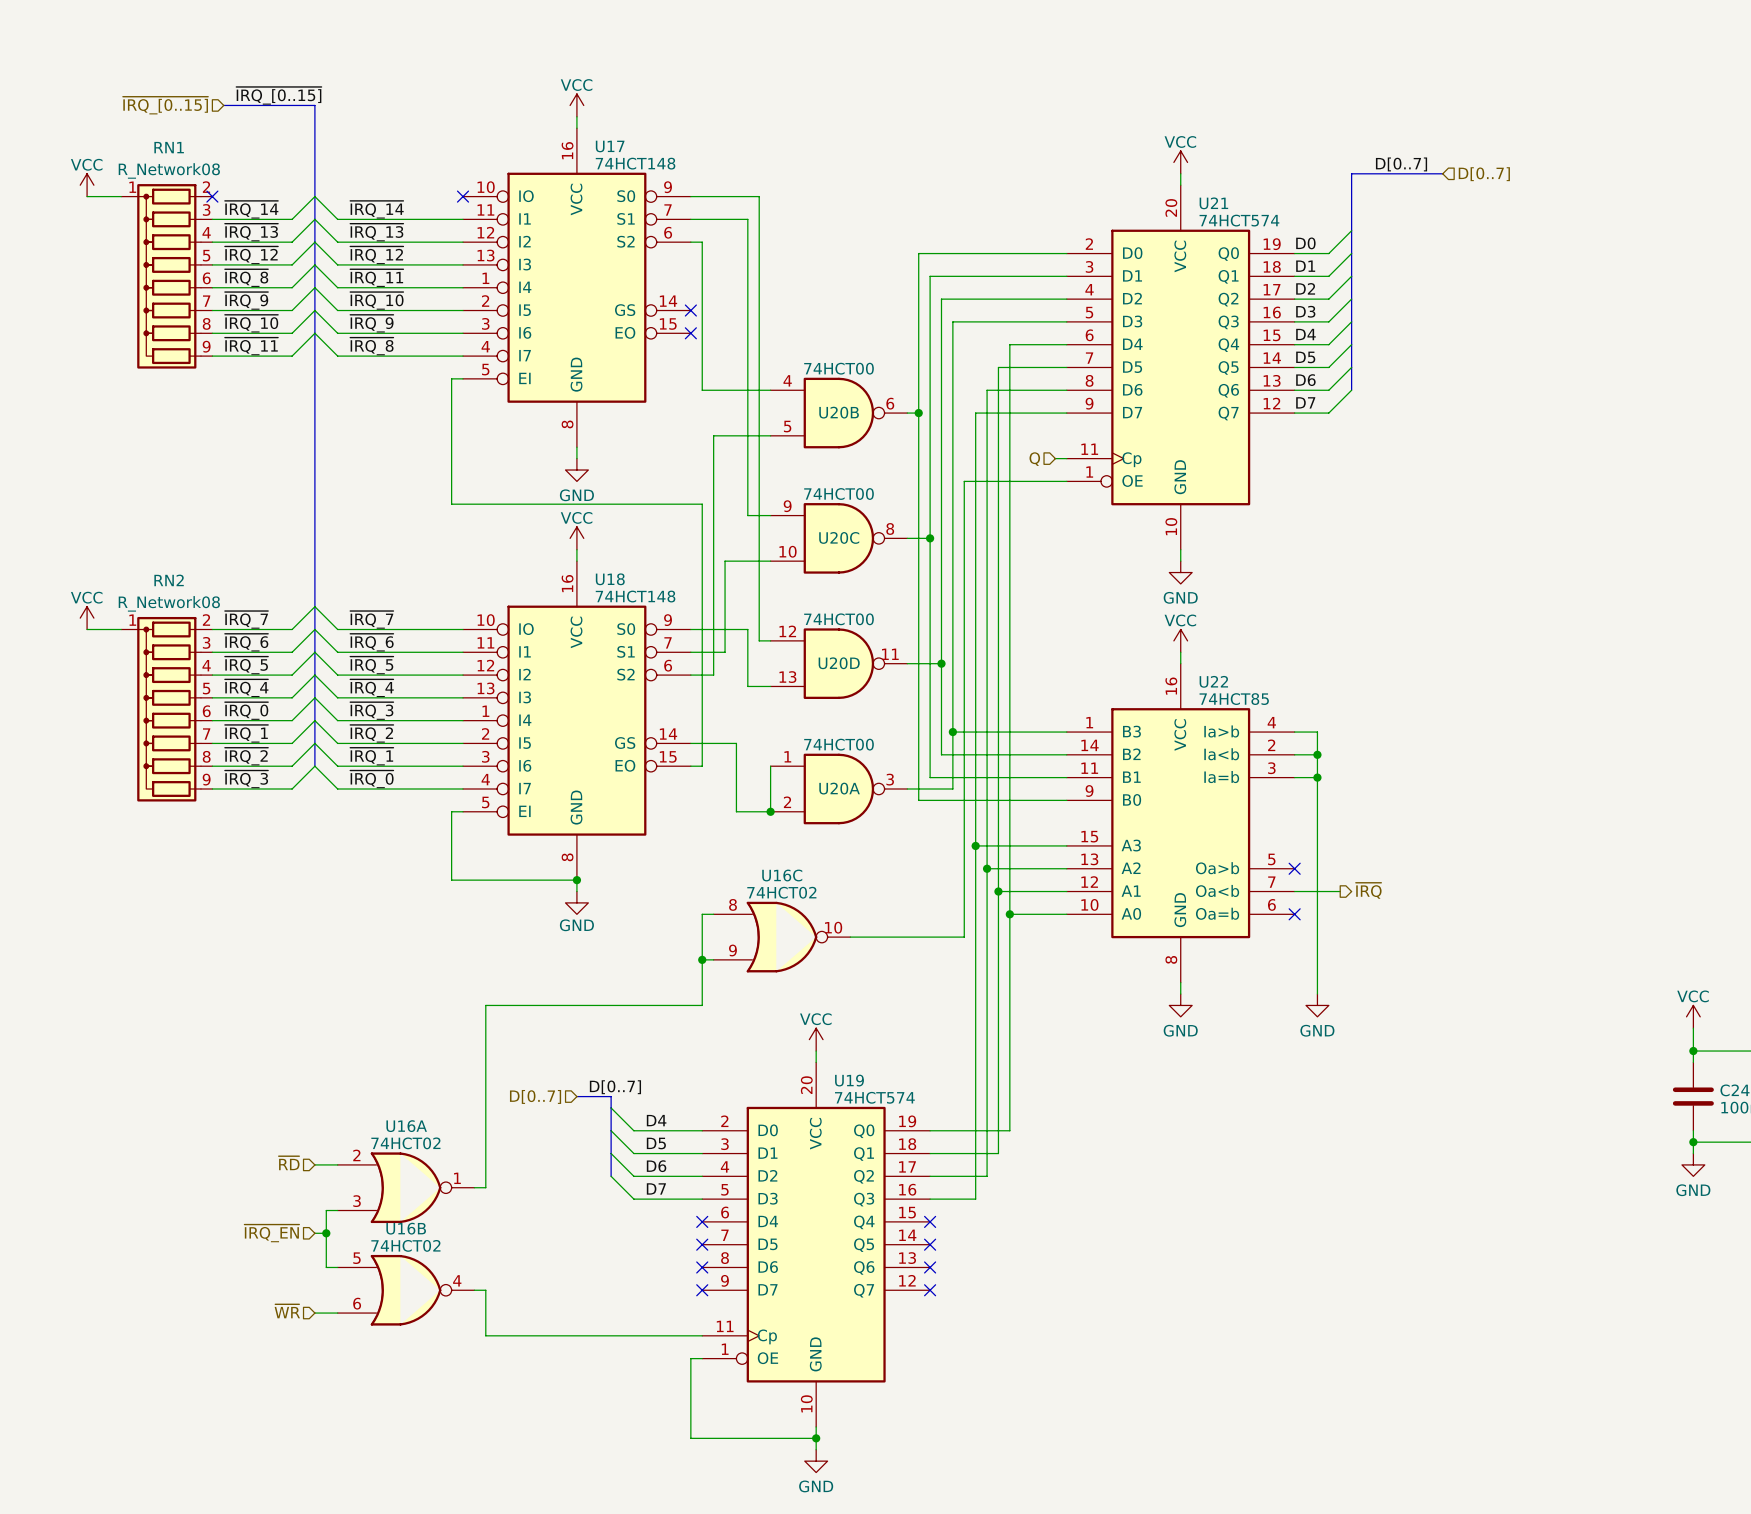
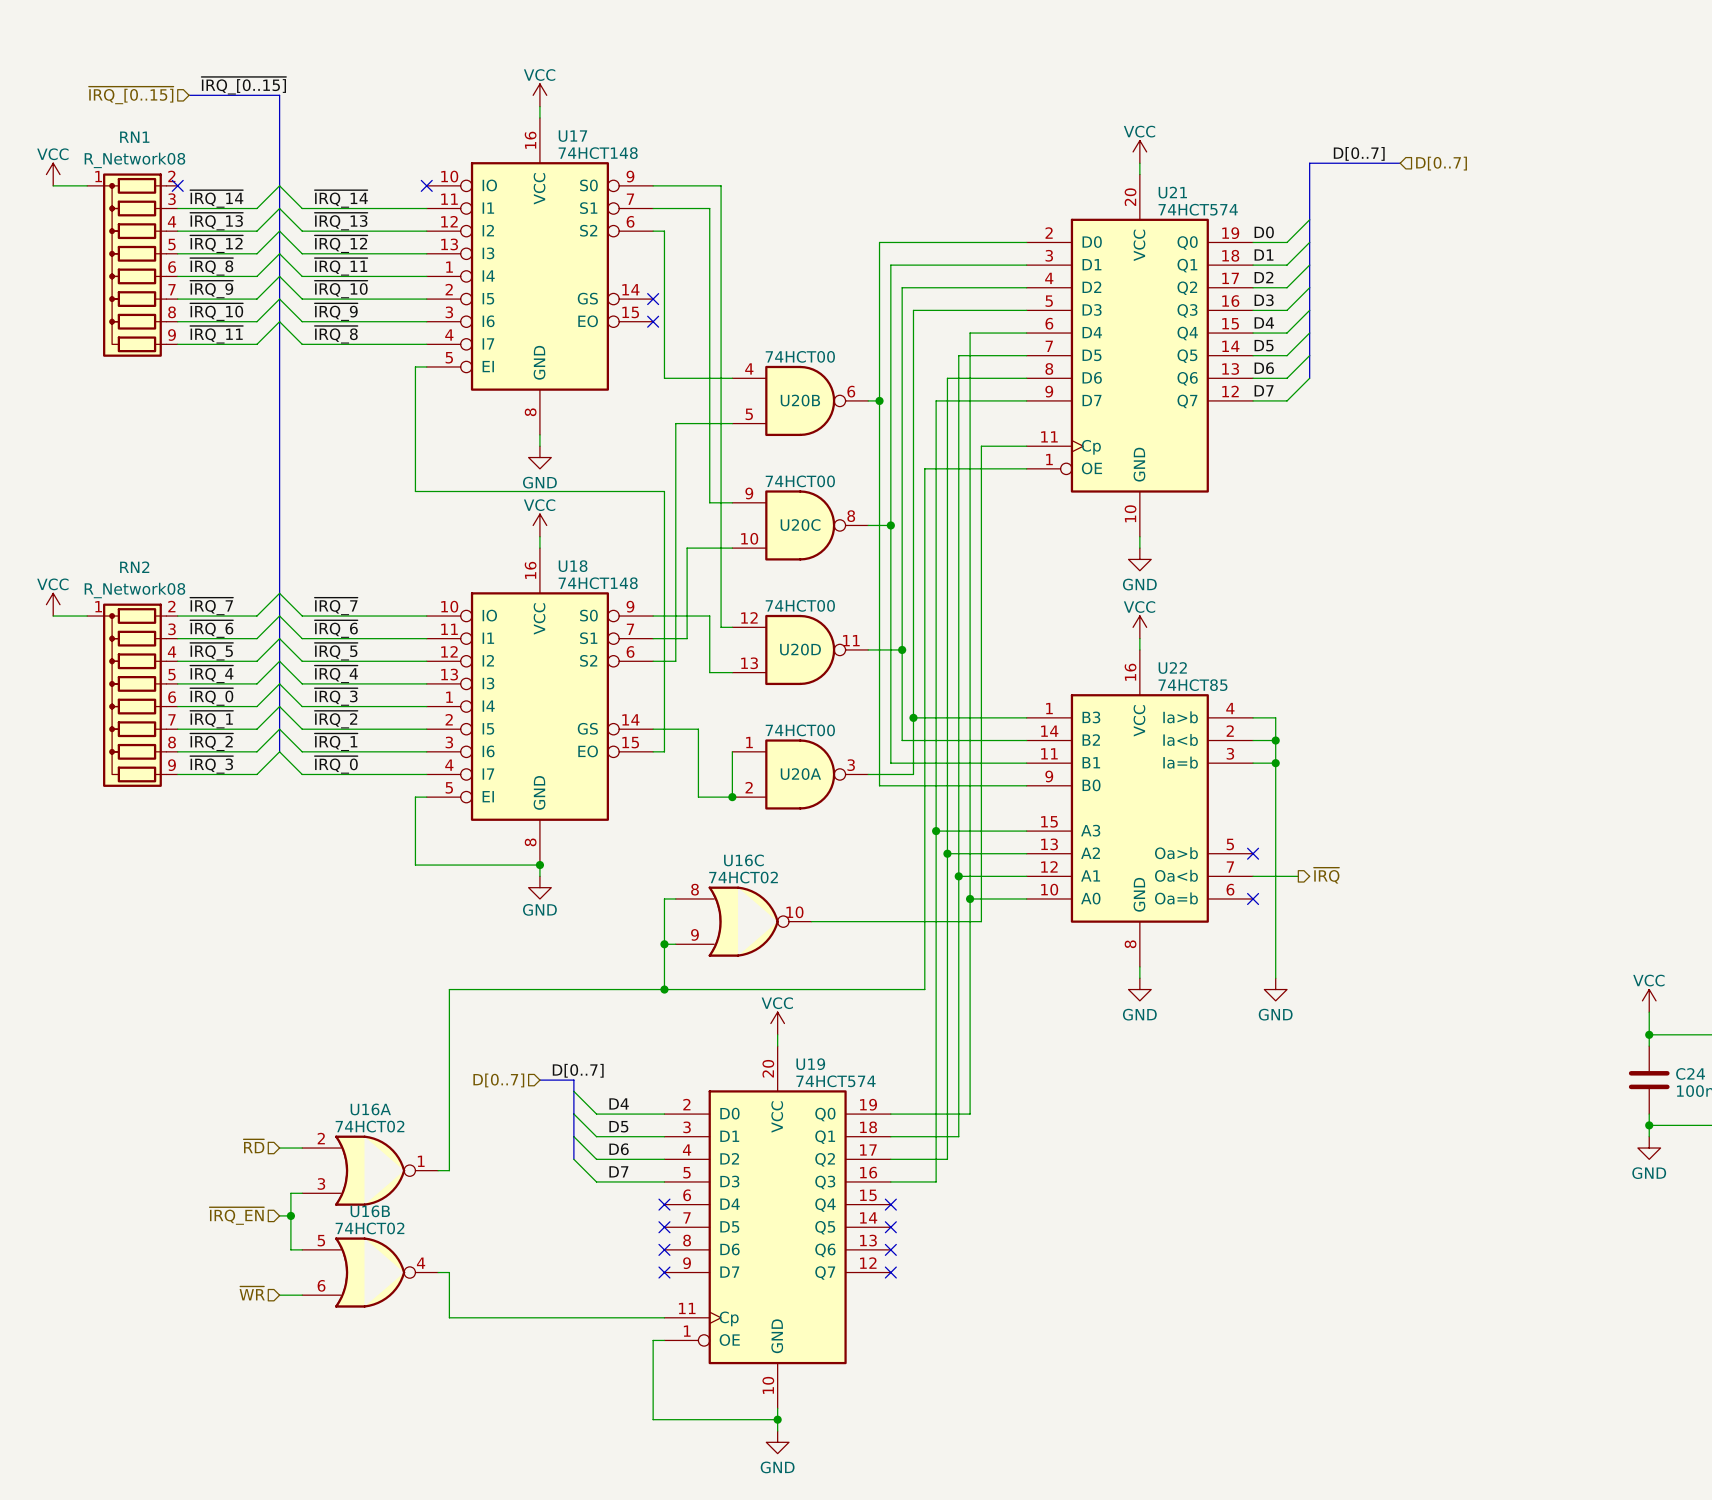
wire: none -> (1015, 446) (981, 446) (981, 921) (924, 921) (924, 989) (664, 989)
hierarchical label: Q (1034, 459) -> none
junction: none -> (664, 989)

